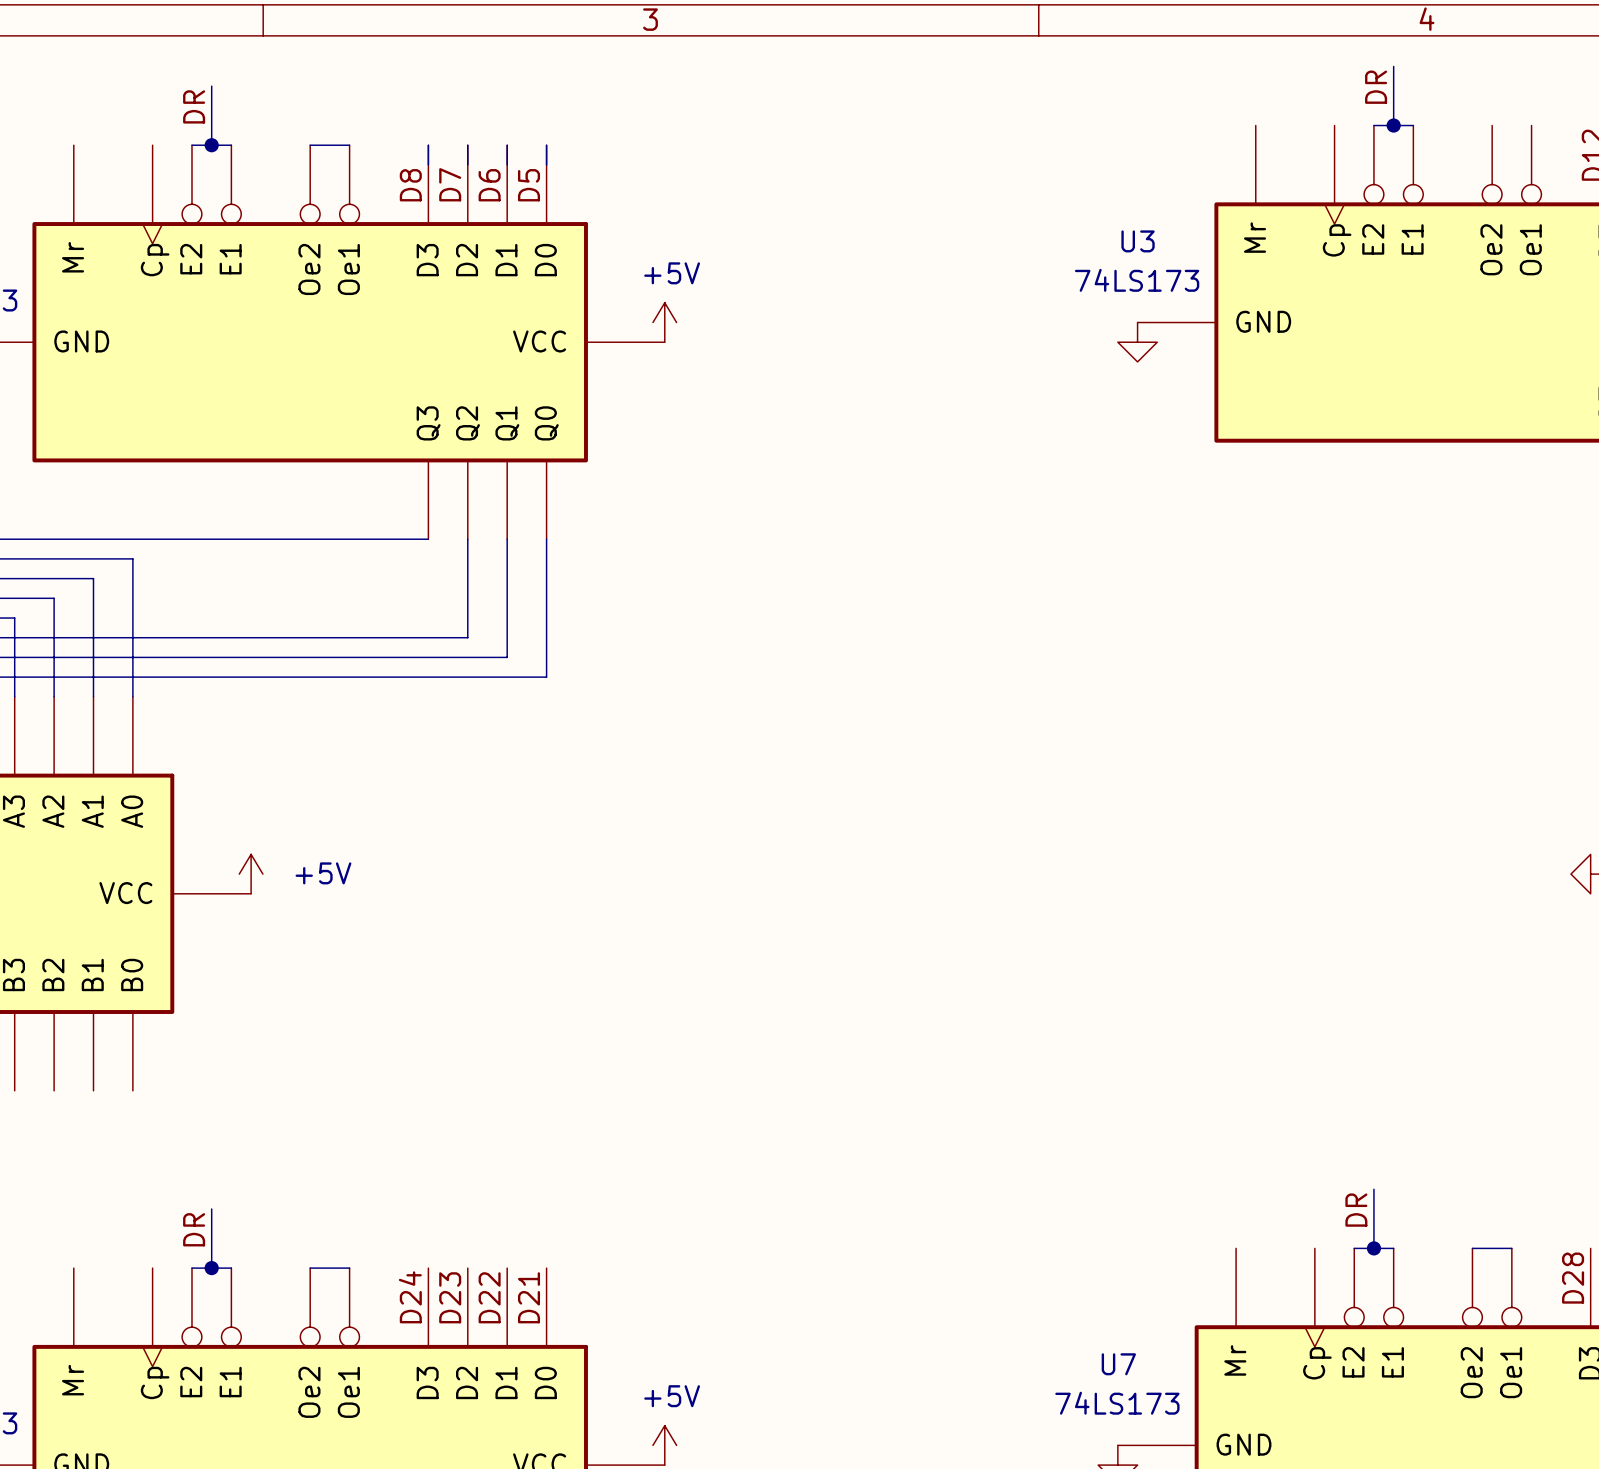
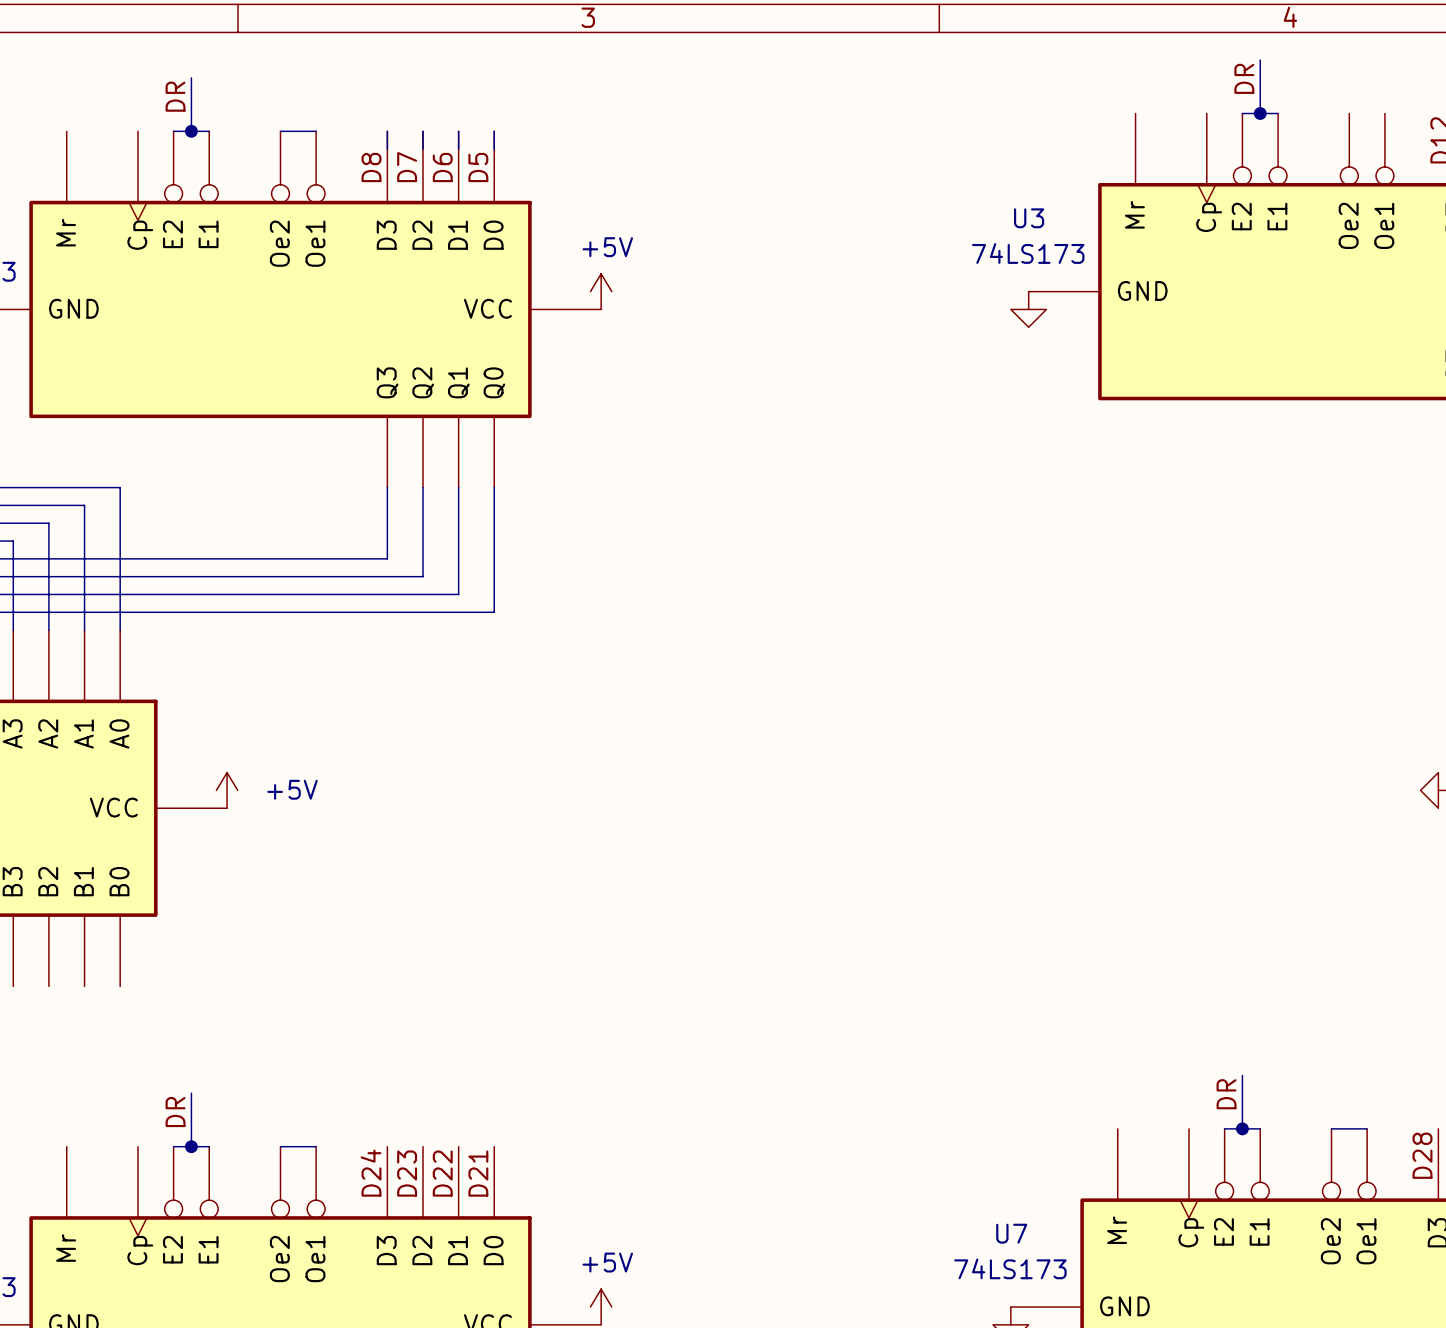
wire: (132, 539) (428, 539) -> (13, 541) (13, 558) (387, 558) (387, 487)
wire: (93, 558) (132, 558) -> (120, 487) (120, 505)
wire: (54, 578) (93, 578) -> (84, 505) (84, 523)
wire: (14, 598) (54, 598) -> (48, 523) (48, 541)

